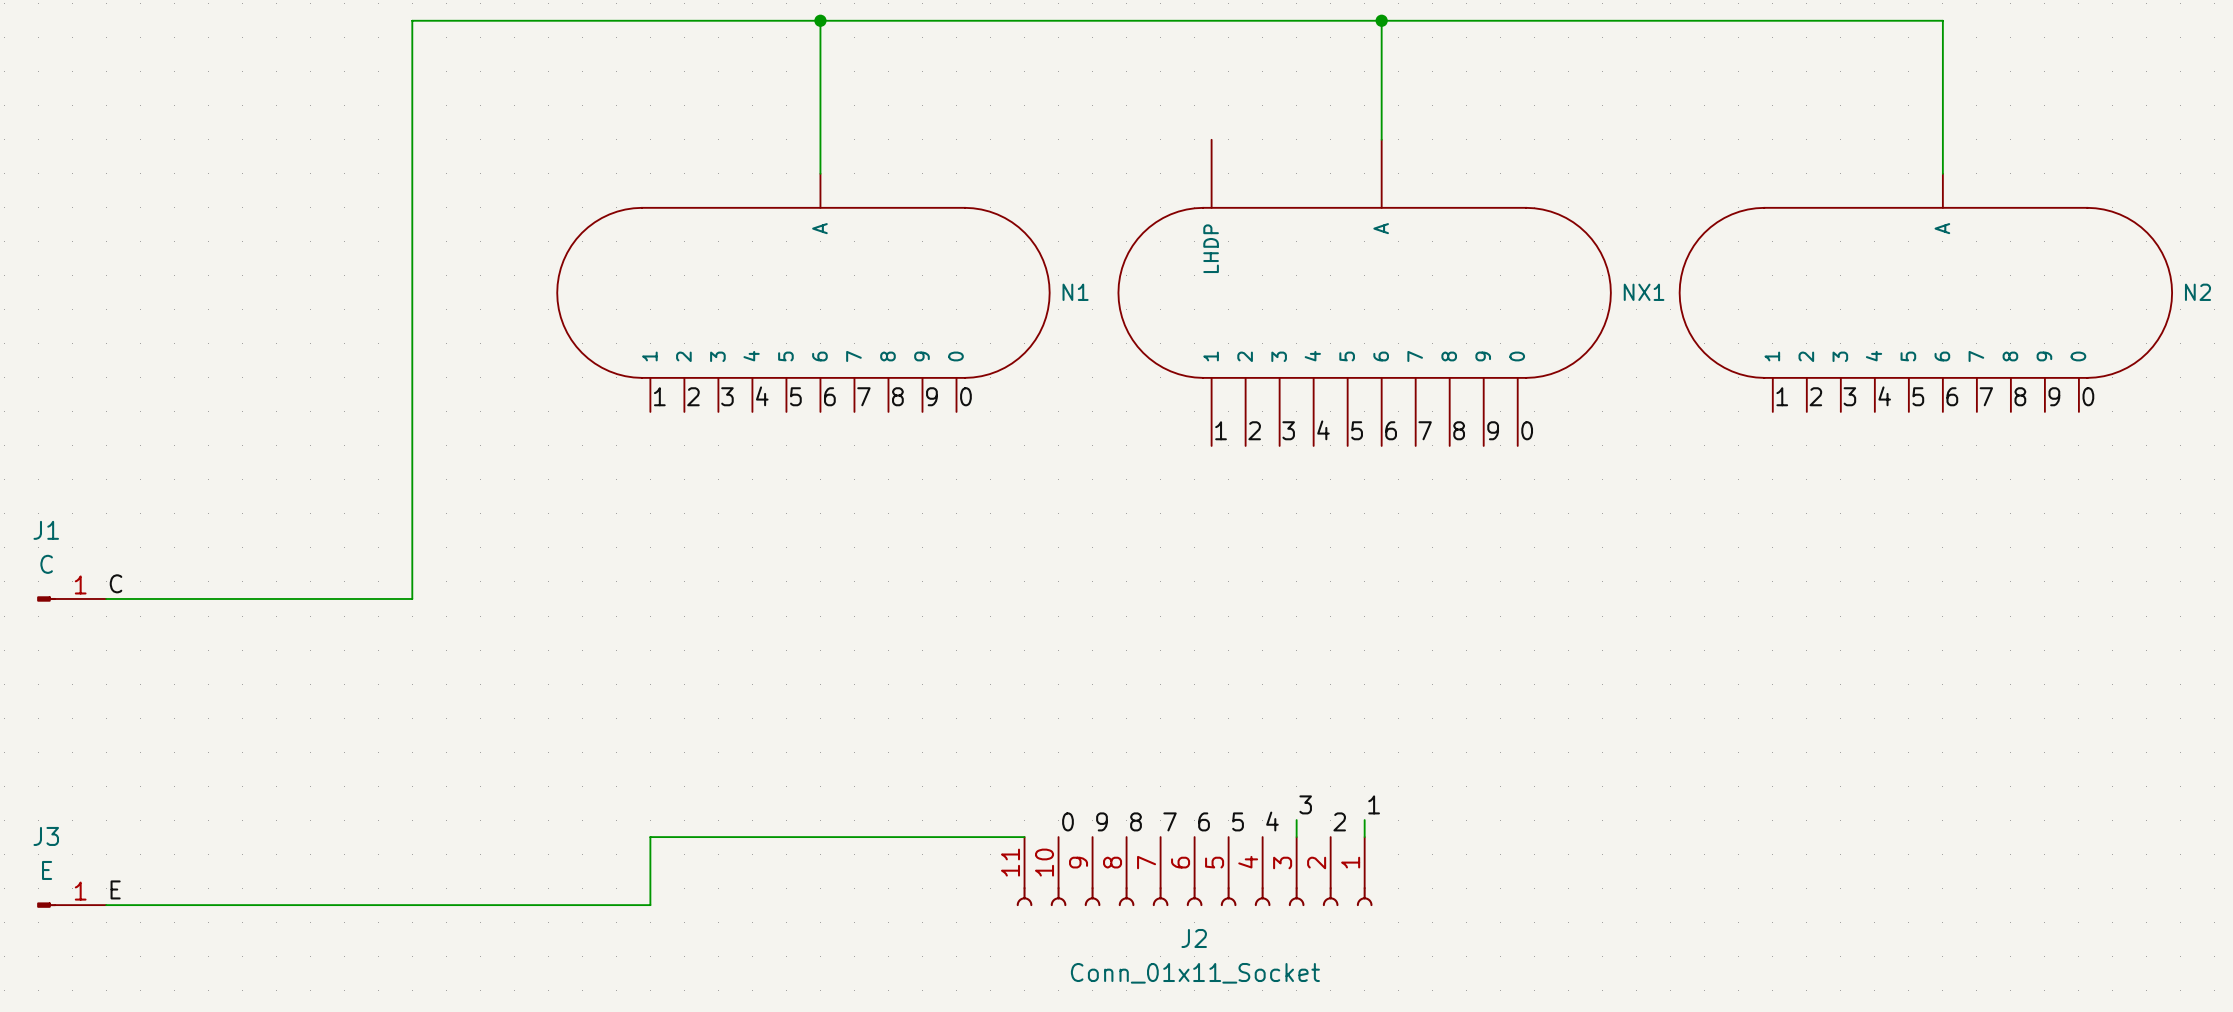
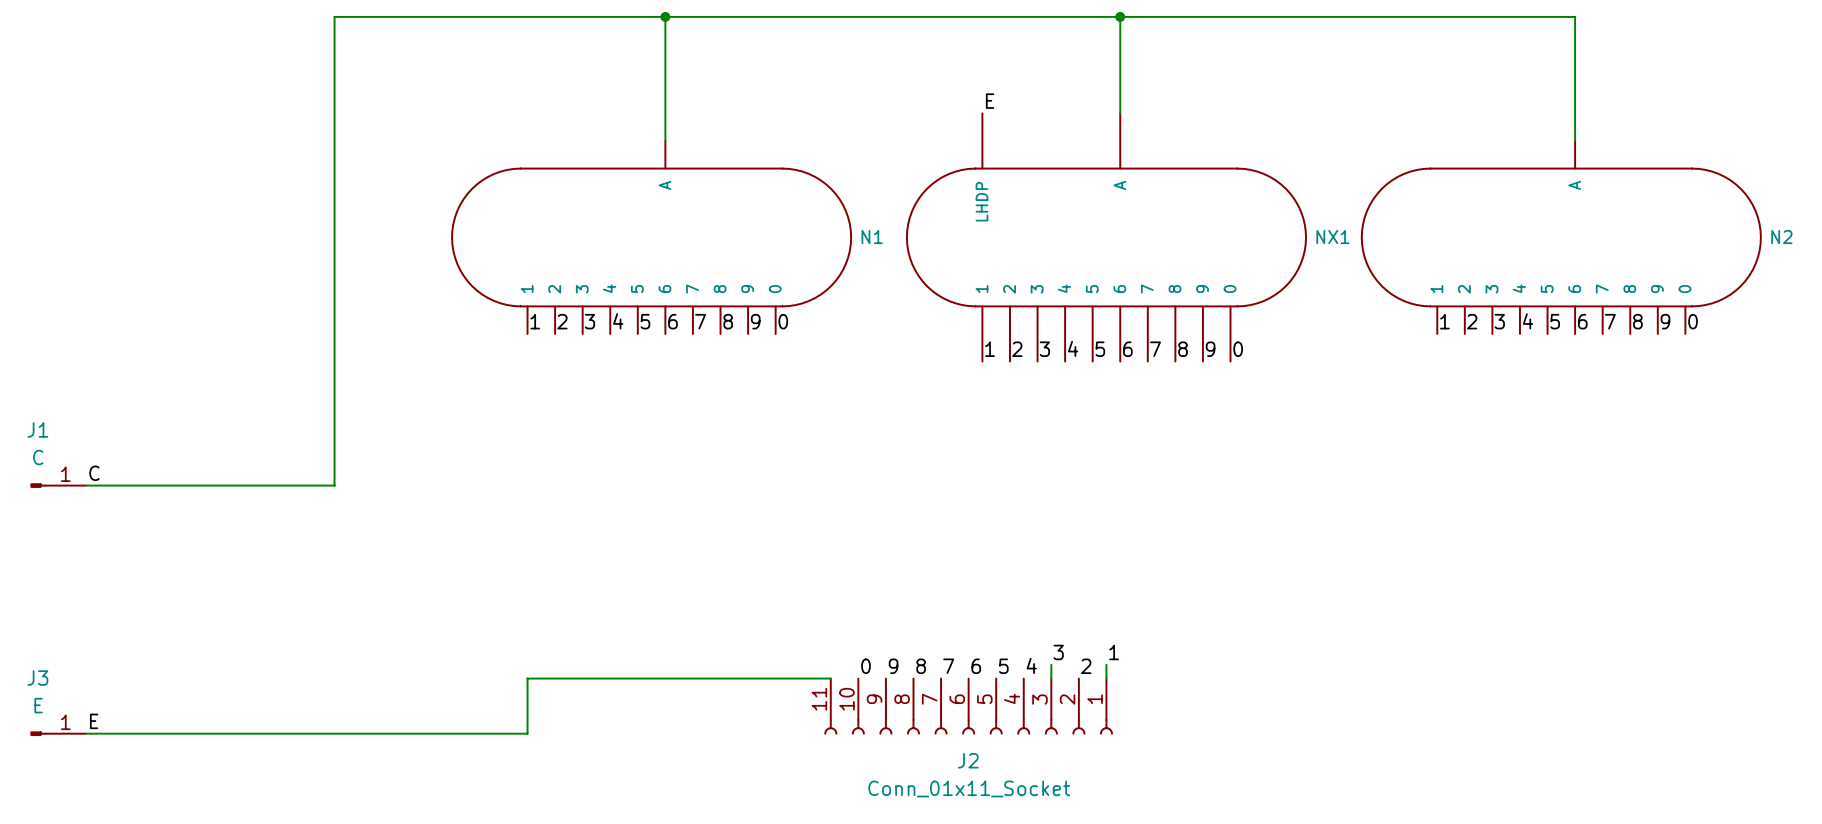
label: none -> E (990, 101)

